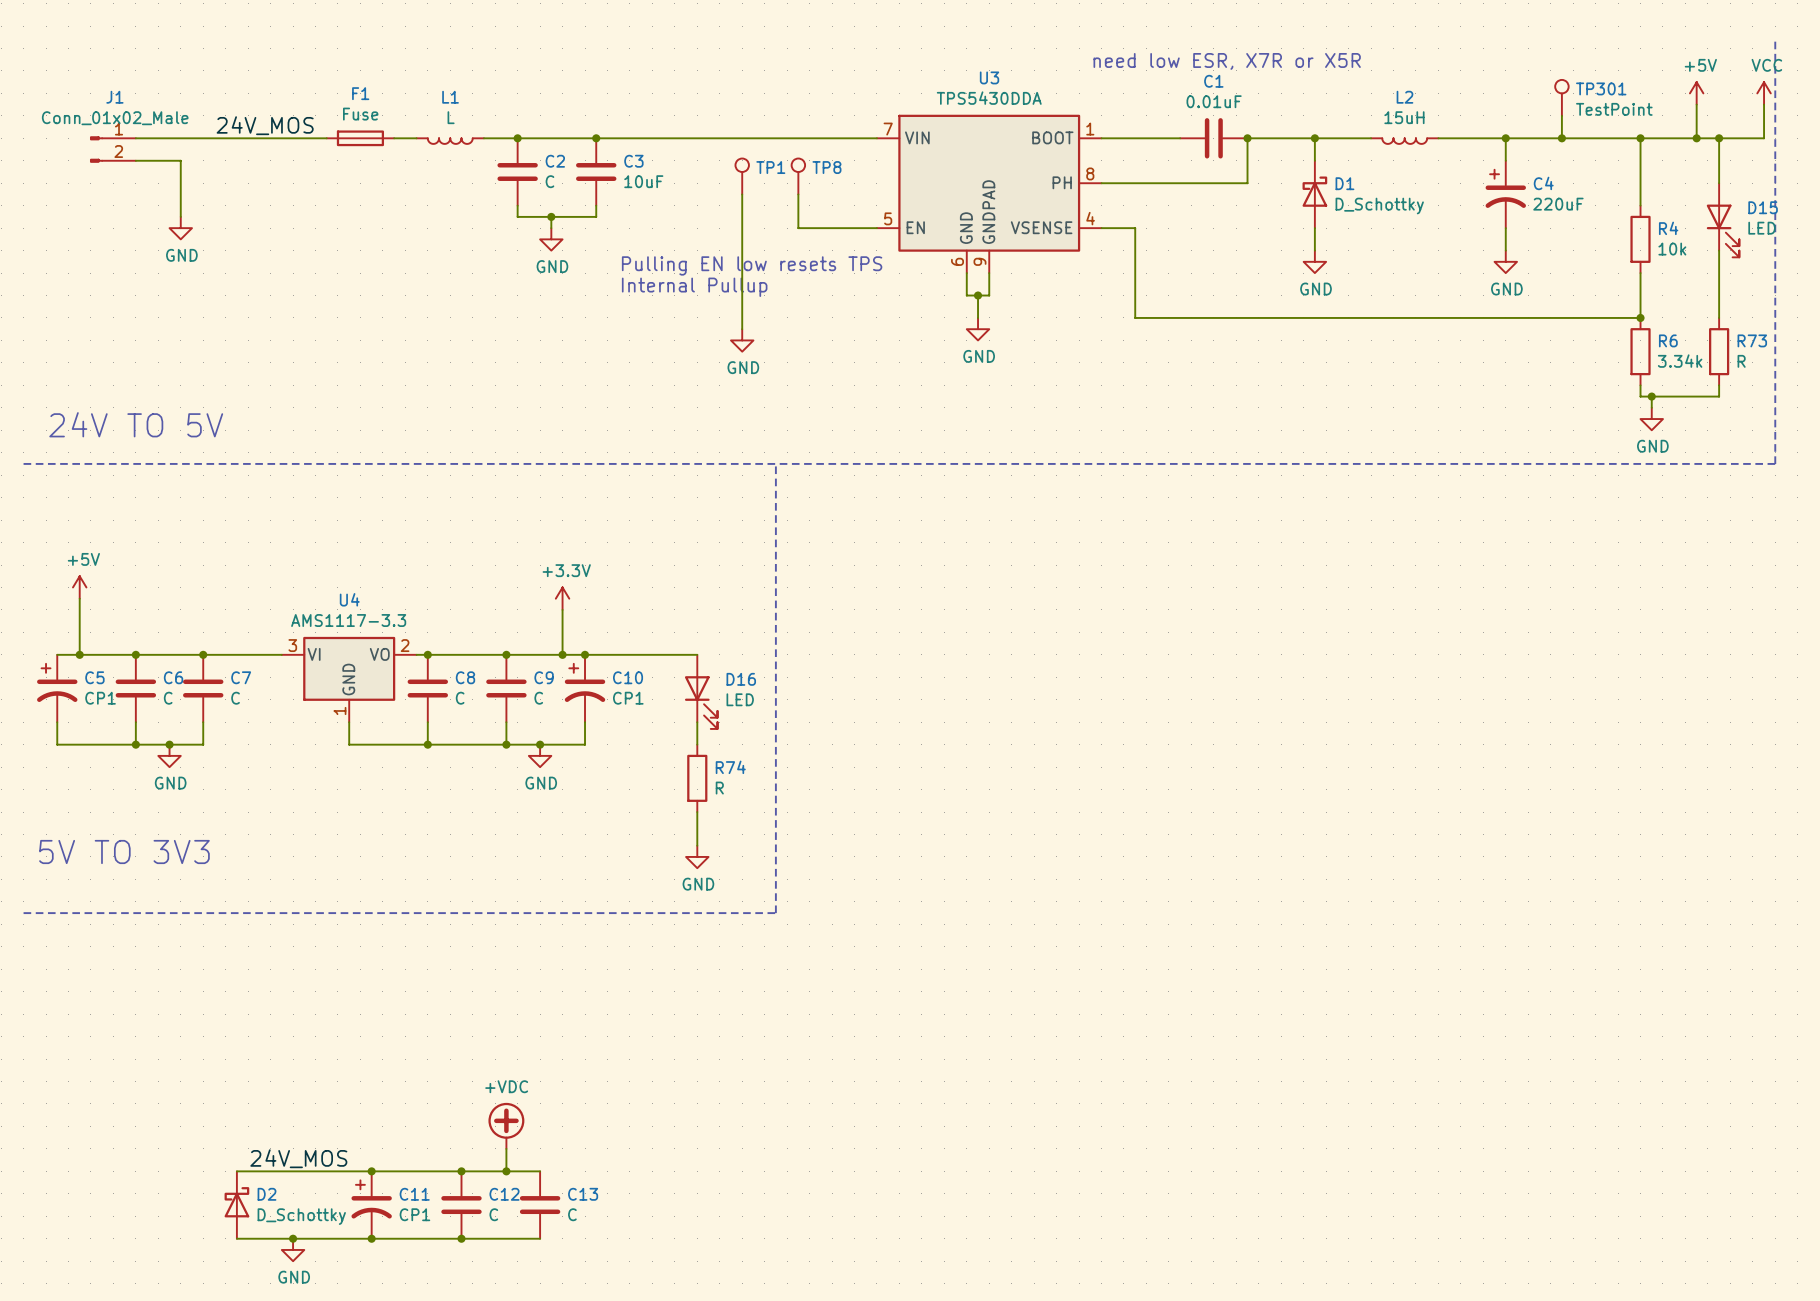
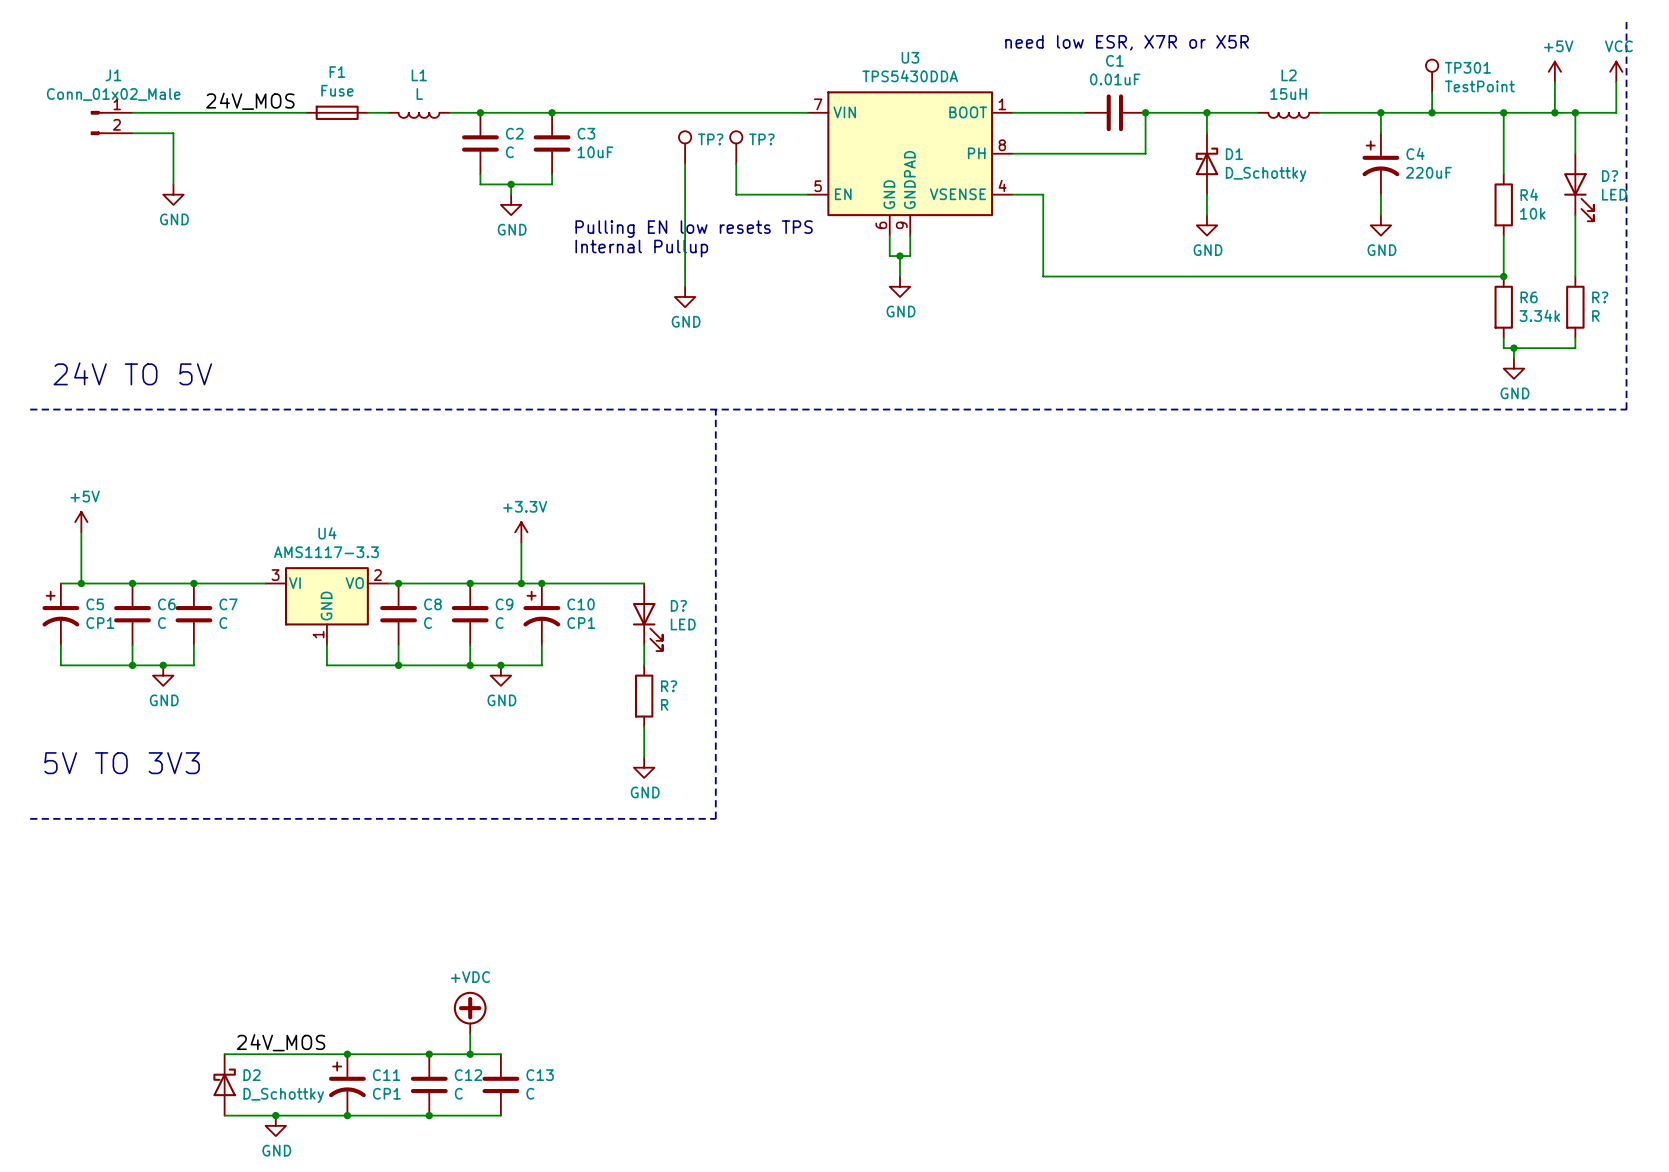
TP1 name: TP1 (770, 167) -> TP? (710, 139)
TP8 name: TP8 (826, 167) -> TP? (761, 139)
D15 name: D15 (1763, 207) -> D? (1610, 176)
R73 name: R73 (1752, 340) -> R? (1600, 297)
D16 name: D16 (741, 679) -> D? (678, 605)
R74 name: R74 (730, 767) -> R? (669, 686)

